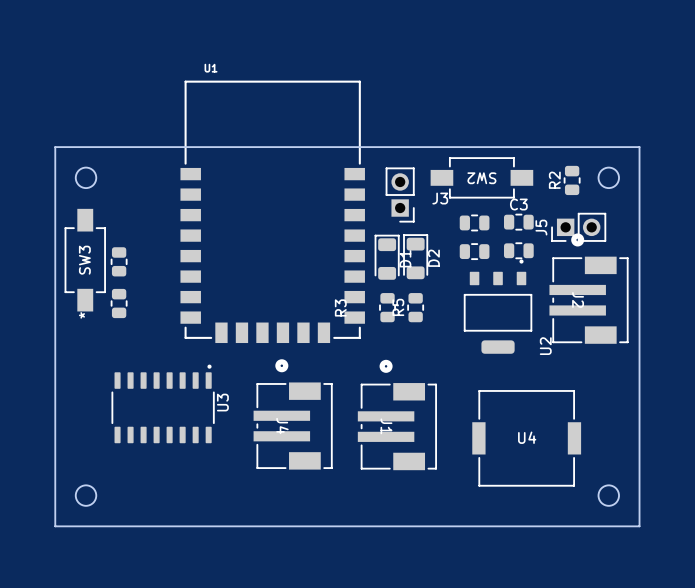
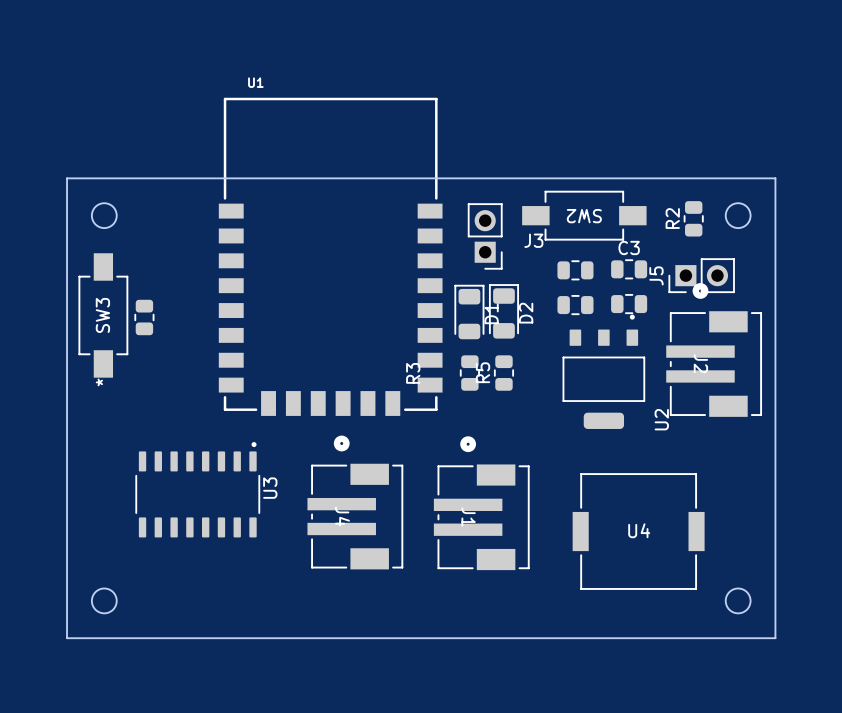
part: (119, 303) -> none

